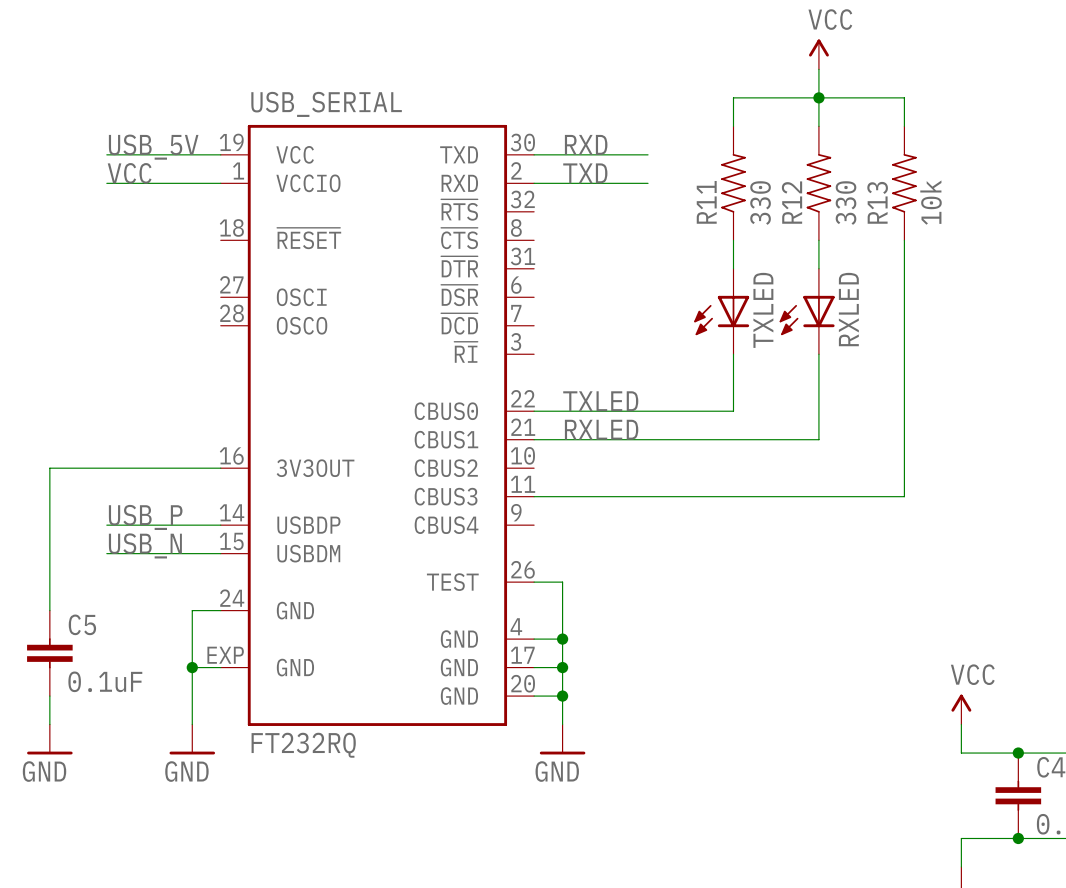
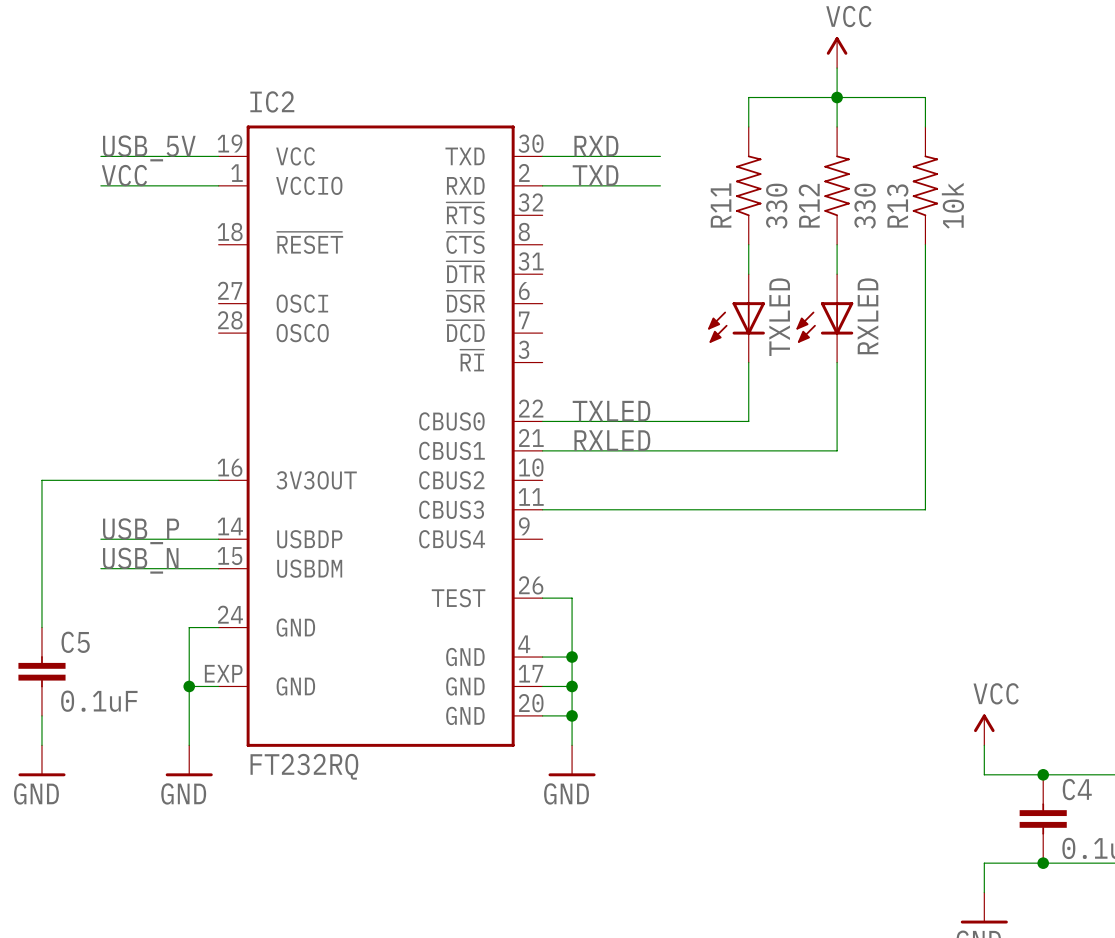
USB_SERIAL name: USB_SERIAL (326, 104) -> IC2 (272, 101)

